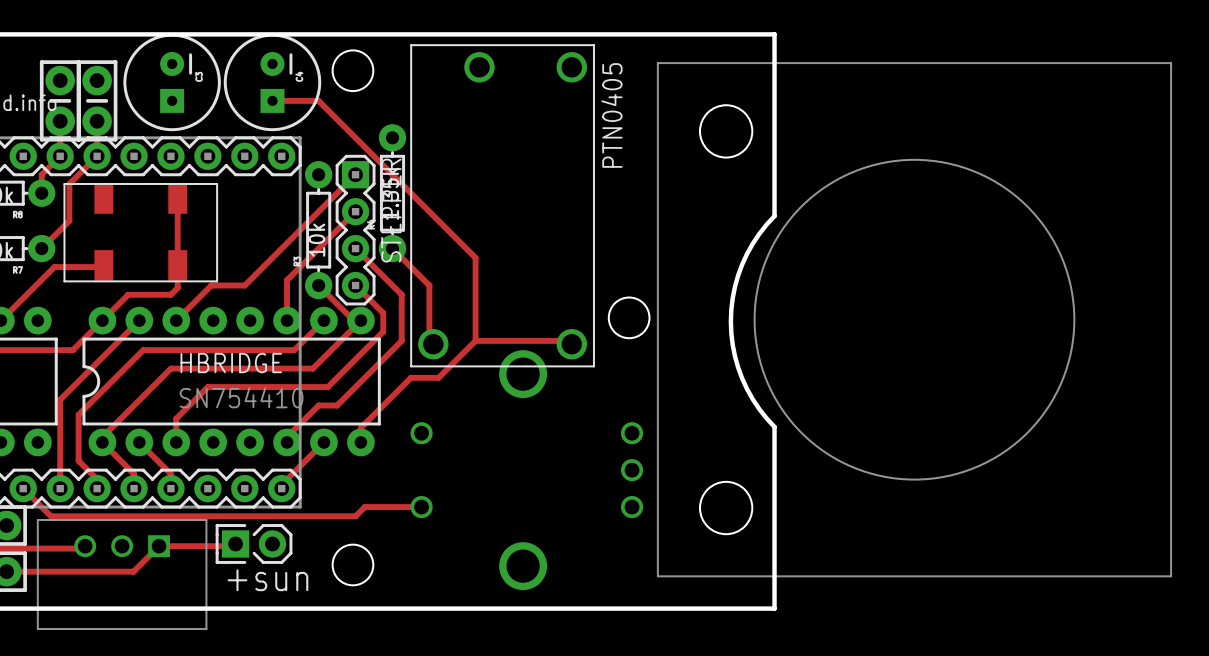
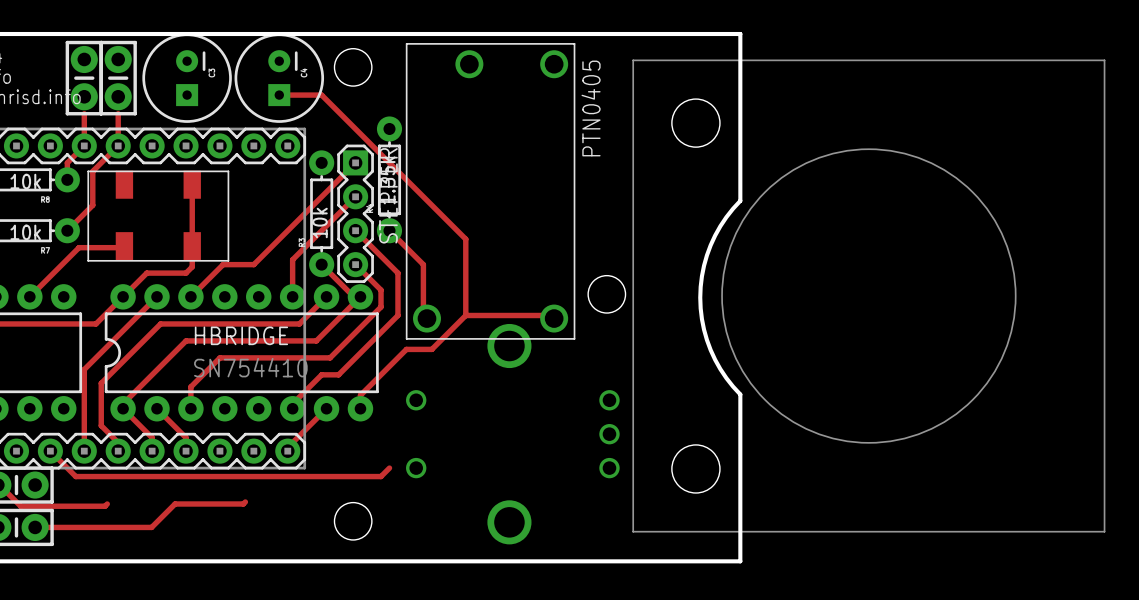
part position: (60, 100) -> (84, 78)
part position: (97, 100) -> (118, 78)
track: (421, 507) (364, 507) (355, 516) -> (389, 468) (381, 476) (355, 476)
part: (254, 543) -> none
part: (122, 574) -> none
text: +sun (267, 580) -> none

